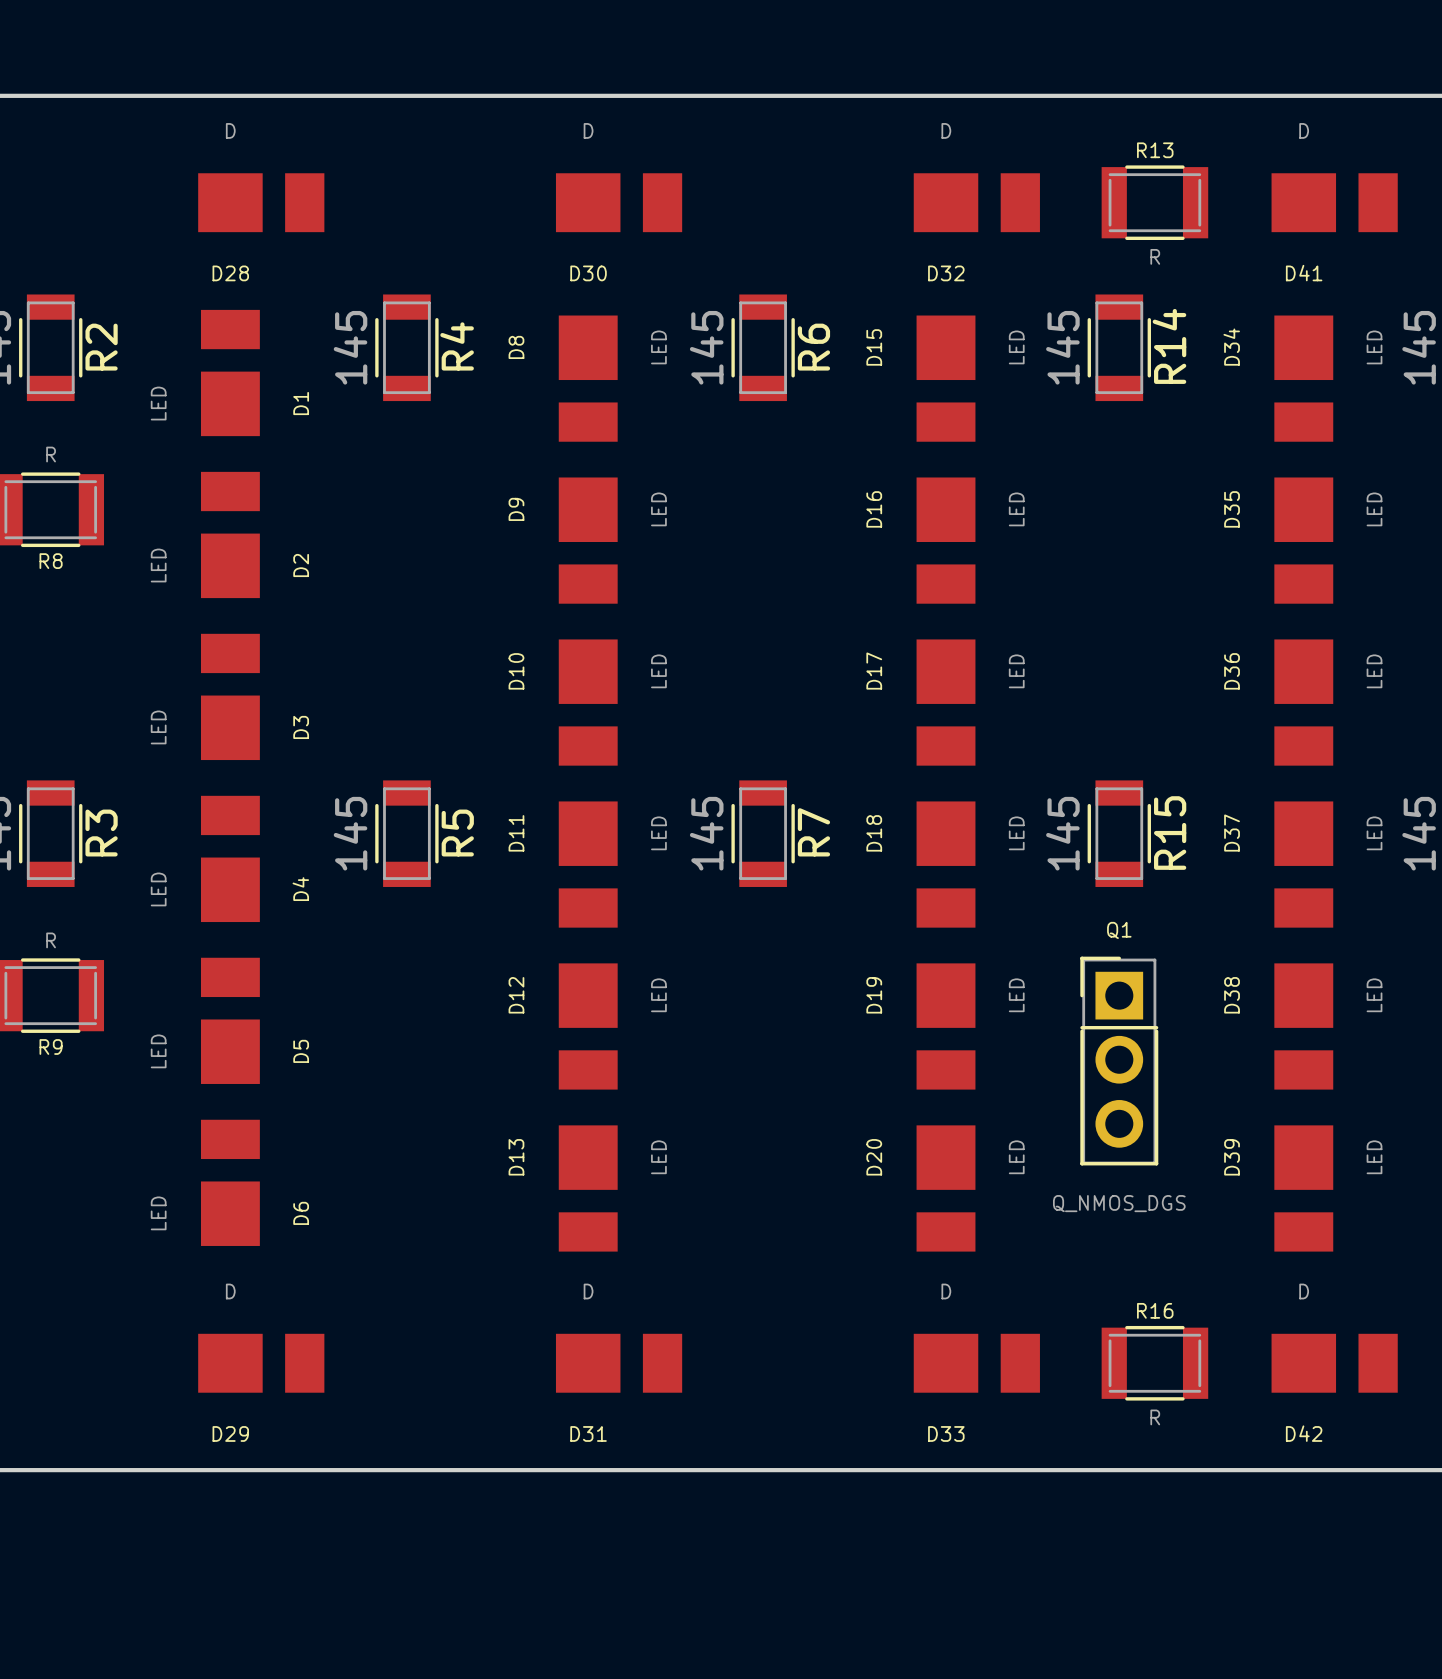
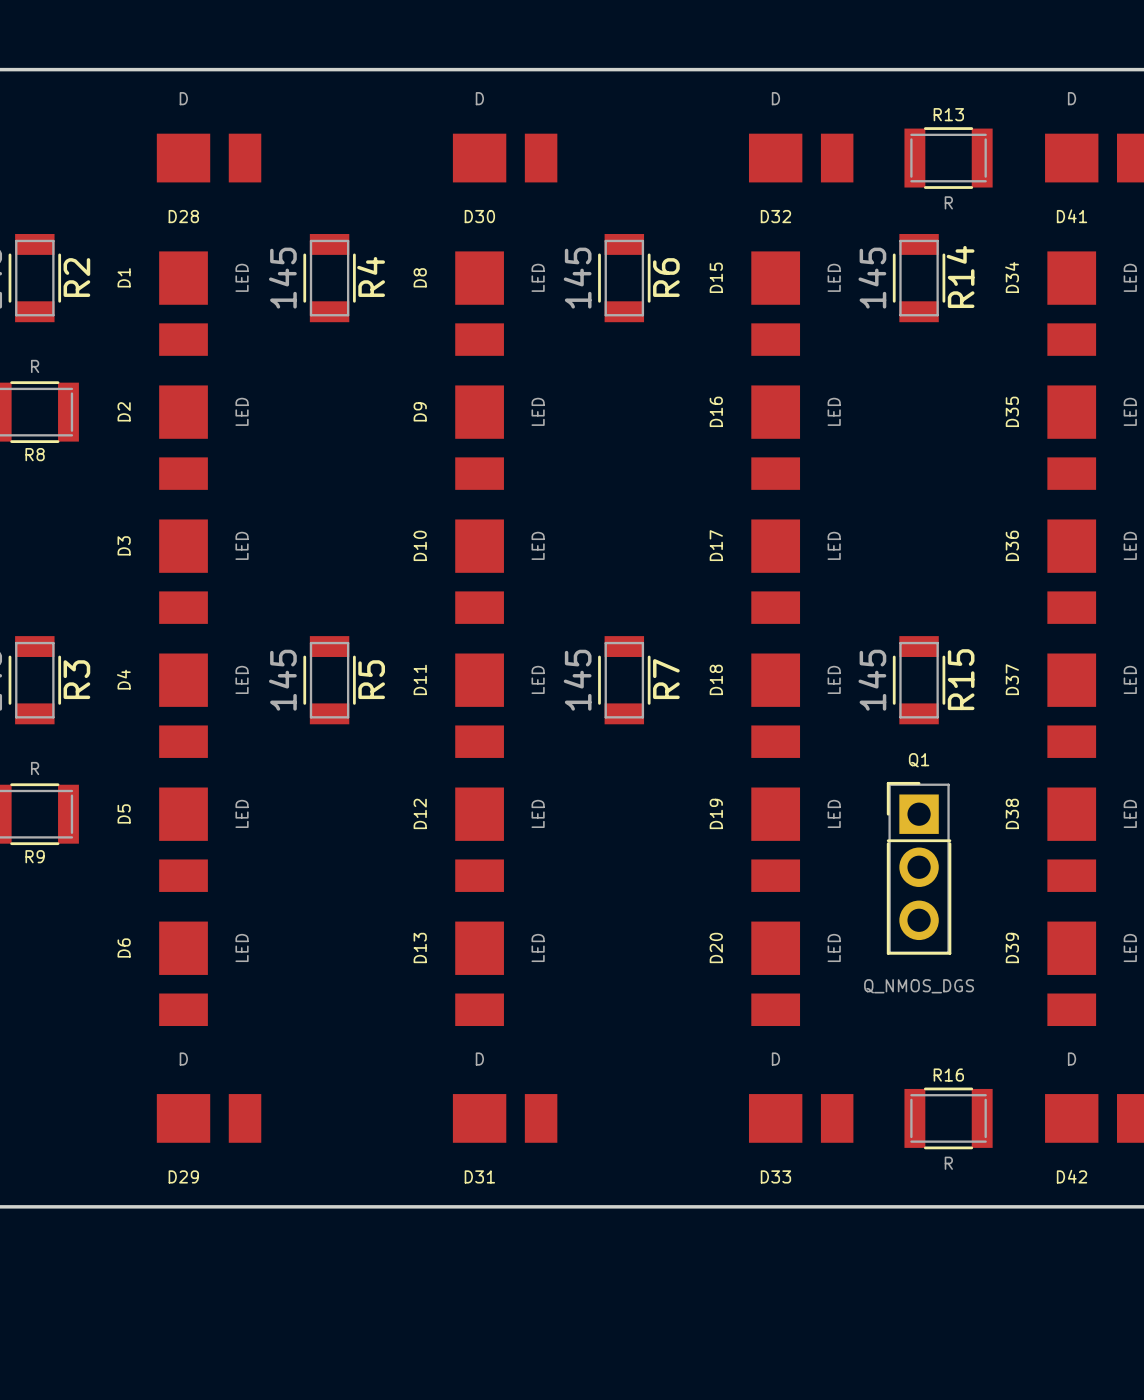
D1 rotation: 0° (230, 373) -> 180° (183, 303)
D2 rotation: 0° (230, 534) -> 180° (183, 437)
D3 rotation: 0° (230, 696) -> 180° (183, 571)
D4 rotation: 0° (230, 858) -> 180° (183, 705)
D5 rotation: 0° (230, 1020) -> 180° (183, 839)
D6 rotation: 0° (230, 1182) -> 180° (183, 973)

